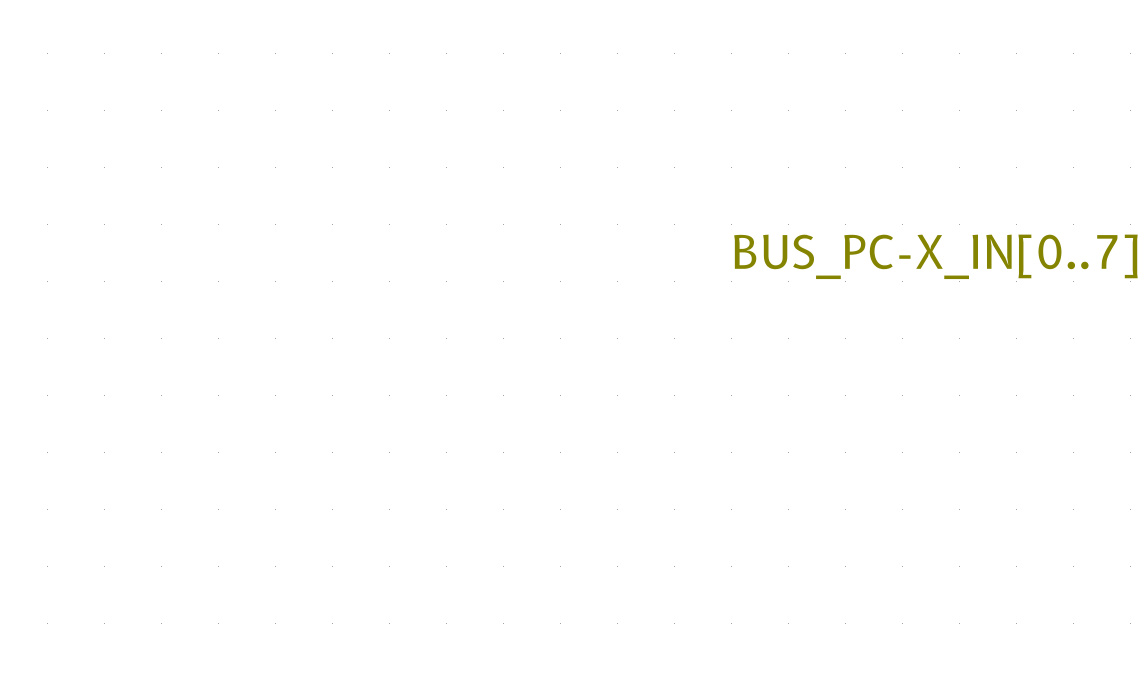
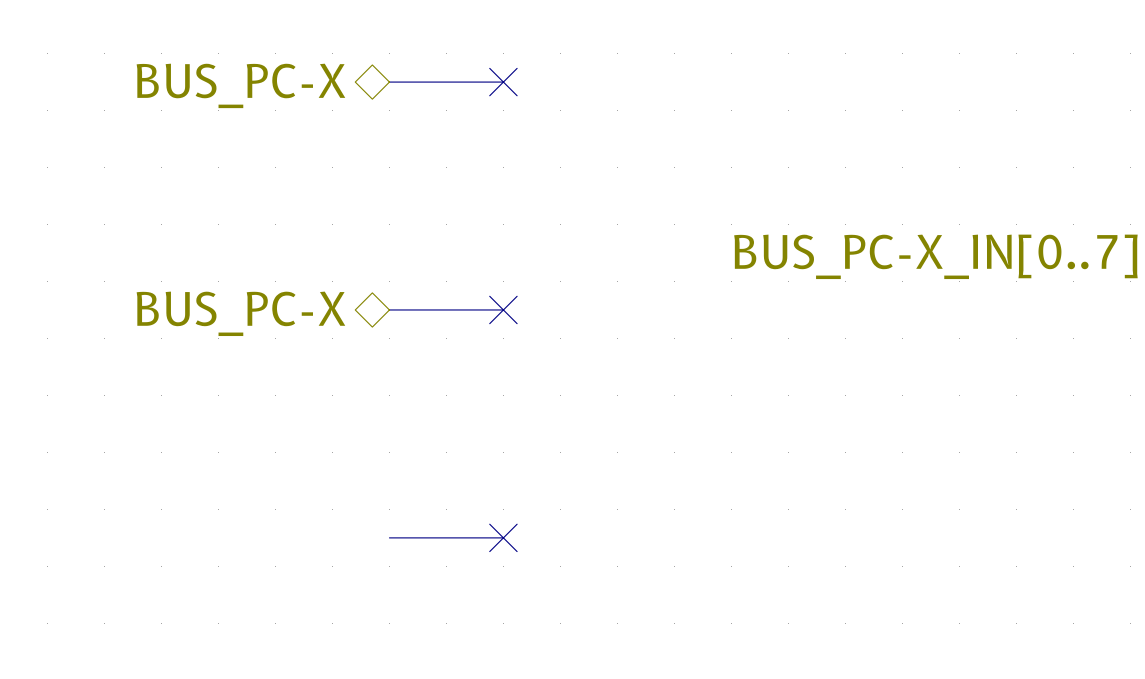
bus: none -> (389, 82) (503, 82)
no-connect mark: none -> (503, 82)
hierarchical label: none -> BUS_PC-X (240, 85)
bus: none -> (389, 309) (503, 309)
no-connect mark: none -> (503, 309)
hierarchical label: none -> BUS_PC-X (240, 313)
bus: none -> (389, 537) (503, 537)
no-connect mark: none -> (503, 537)

